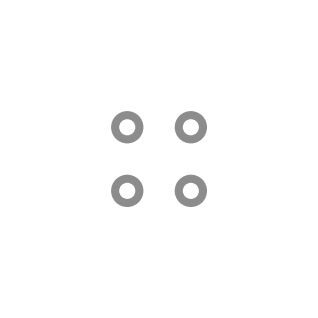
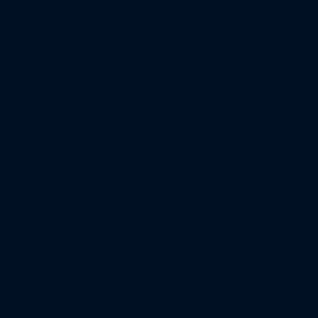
part: (159, 159) -> none

